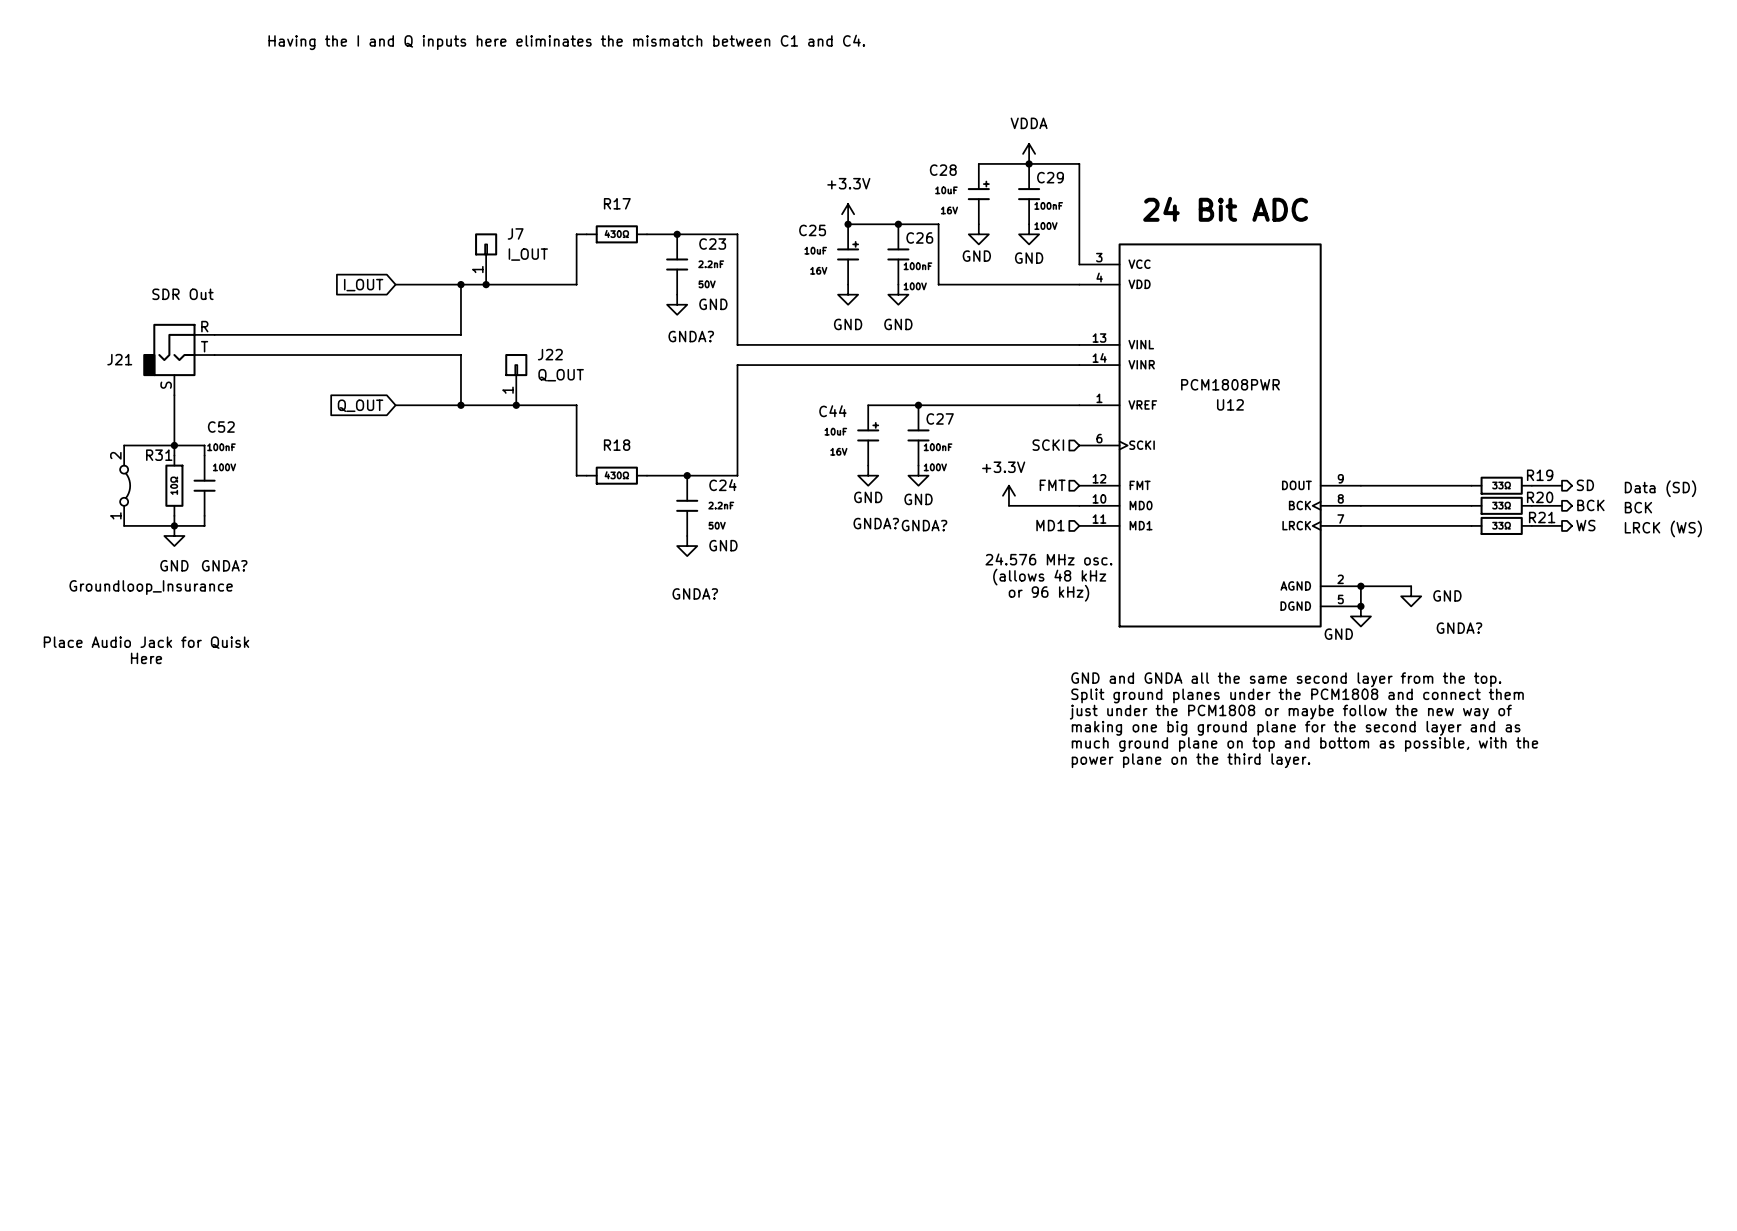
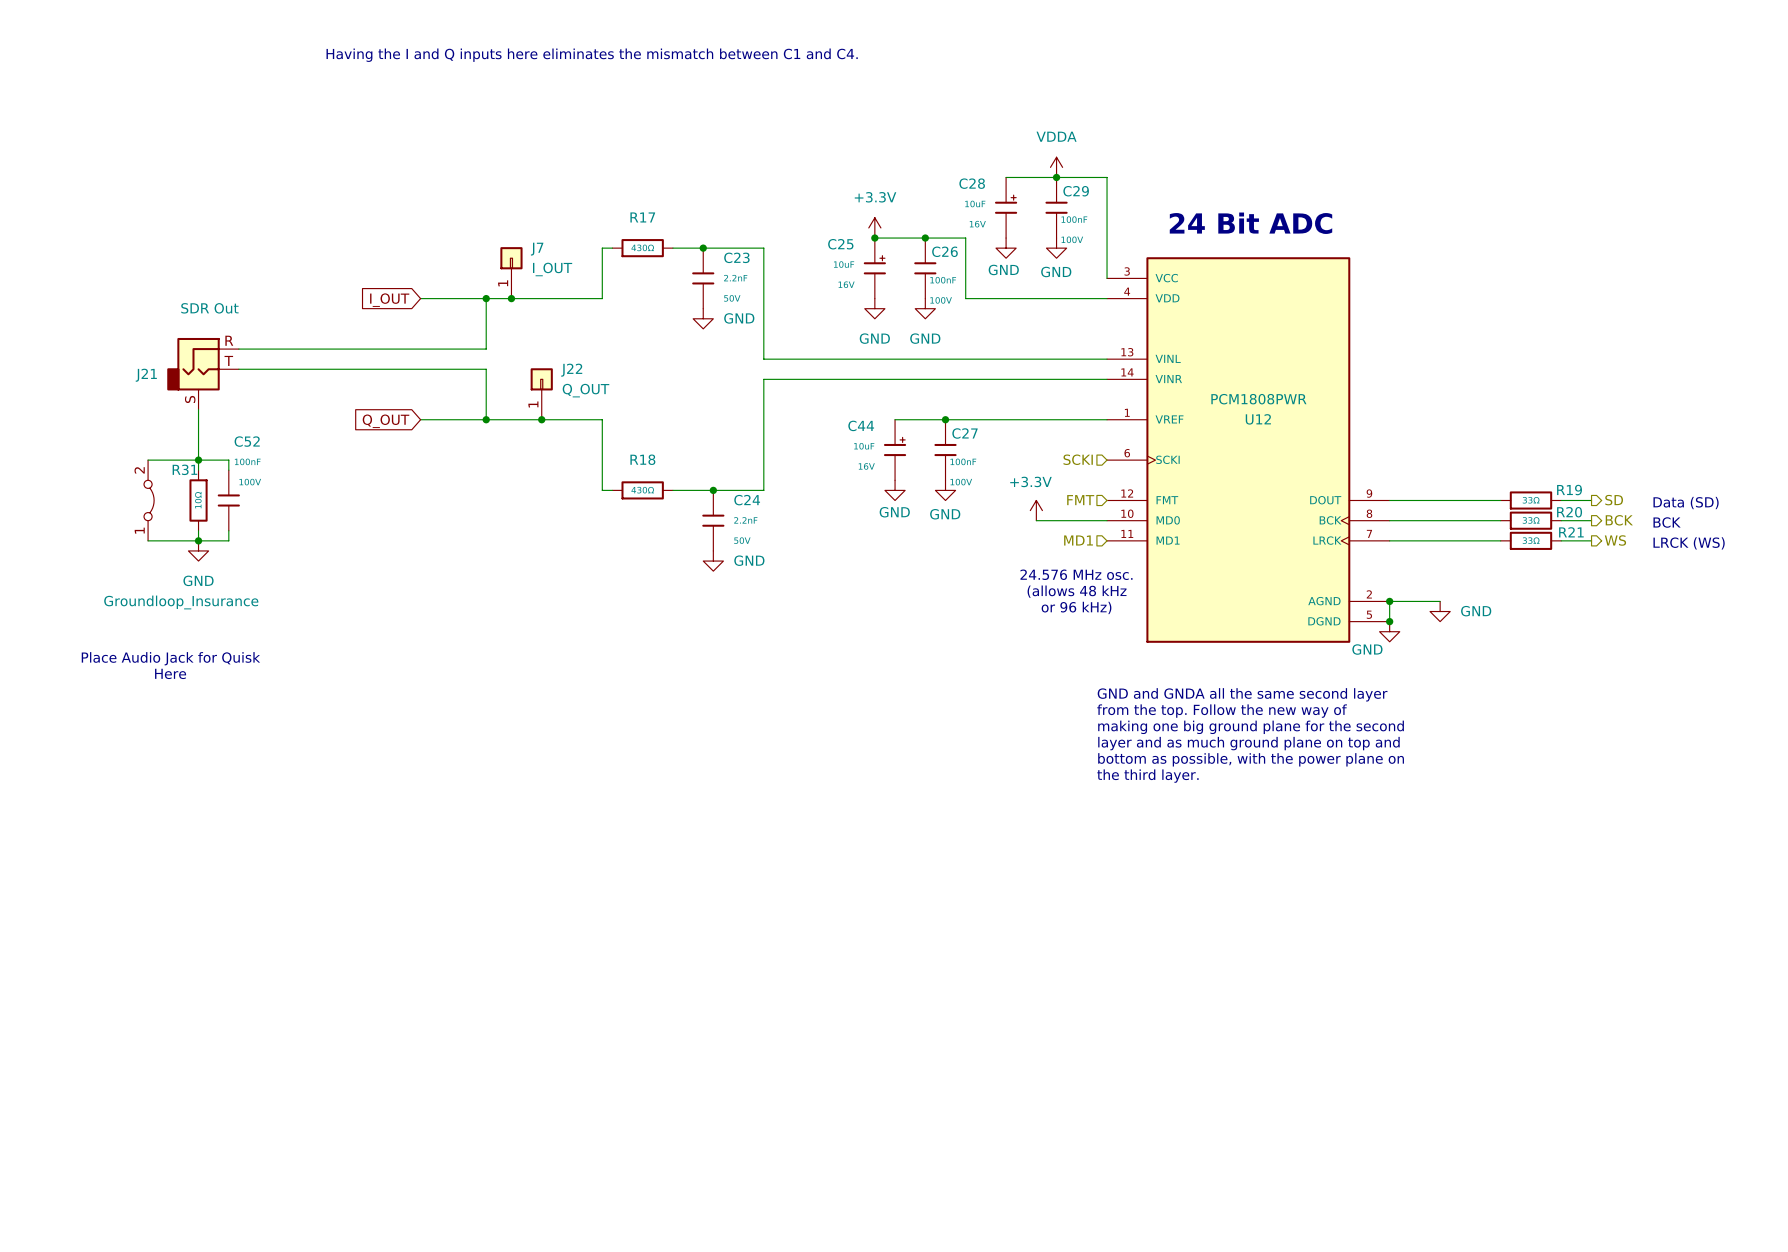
text: GNDA? (691, 336) -> none
text: GNDA? (876, 523) -> none
text: GNDA? (924, 525) -> none
text: GNDA? (224, 565) -> none
text: GNDA? (695, 593) -> none
text: GNDA? (1459, 628) -> none
text: GND and GNDA all the same second layer from the top. (1286, 679) -> GND and GNDA all the same second layer (1242, 694)
text: Split ground planes under the PCM1808 and connect them (1297, 695) -> from the top. Follow the new way of (1222, 711)
text: just under the PCM1808 or maybe follow the new way of (1290, 712) -> making one big ground plane for the second (1251, 727)
text: making one big ground plane for the second layer and as (1296, 728) -> layer and as much ground plane on top and (1248, 743)
text: much ground plane on top and bottom as possible, with the (1304, 744) -> bottom as possible, with the power plane on (1251, 759)
text: power plane on the third layer. (1191, 760) -> the third layer. (1147, 776)

